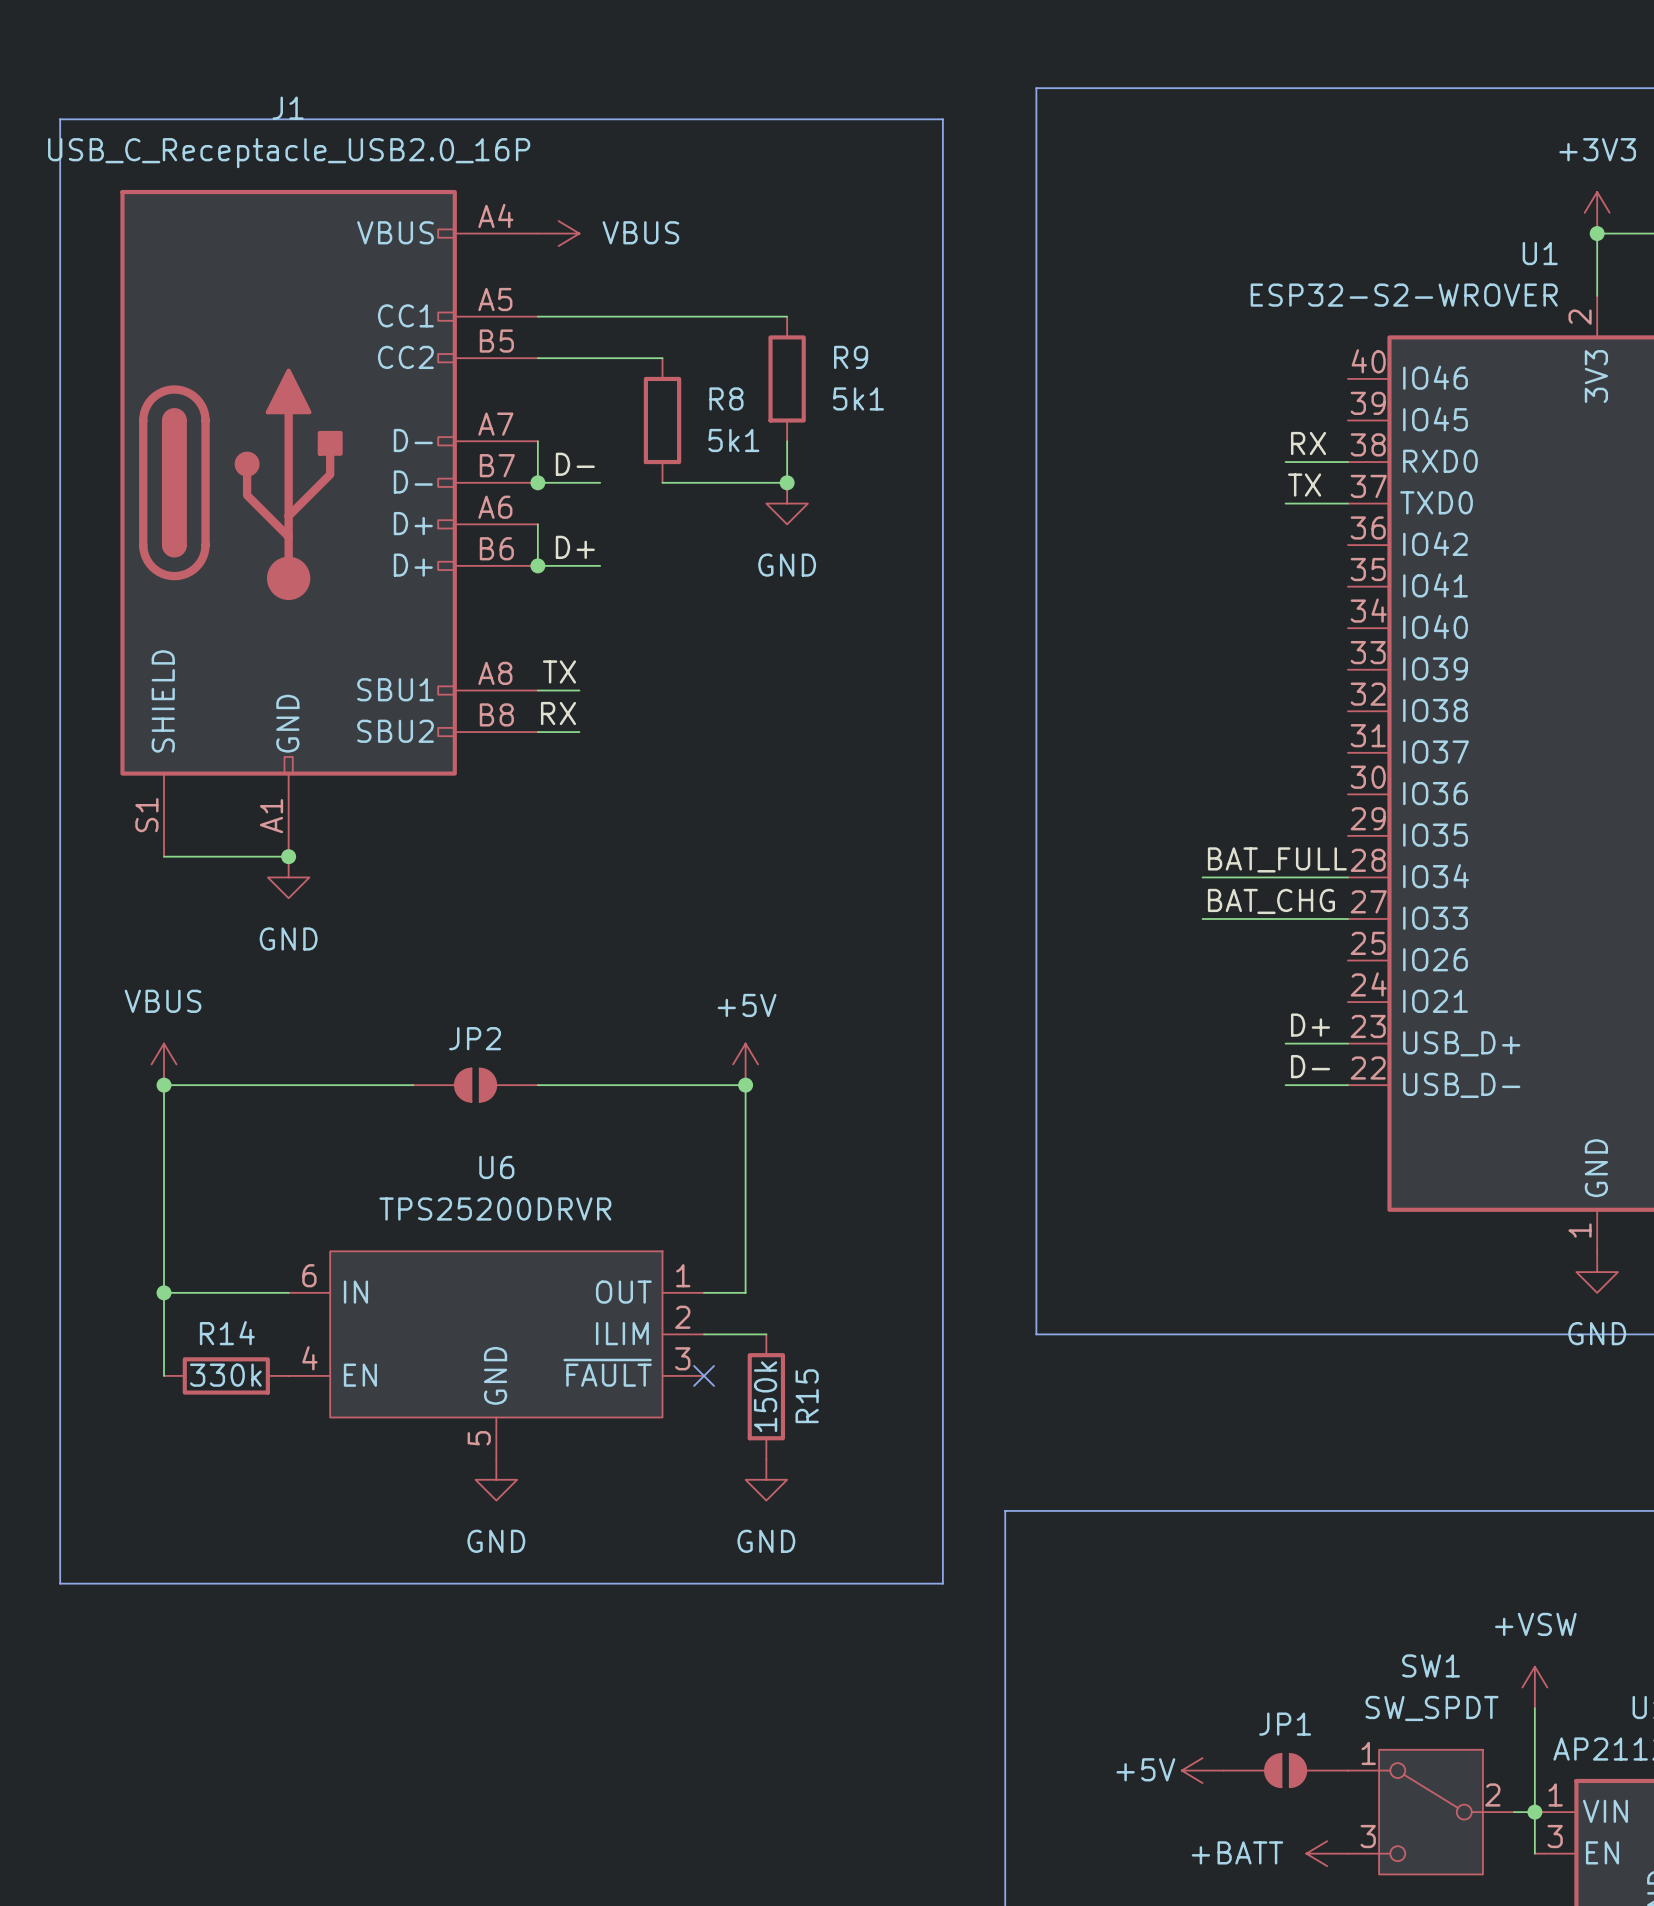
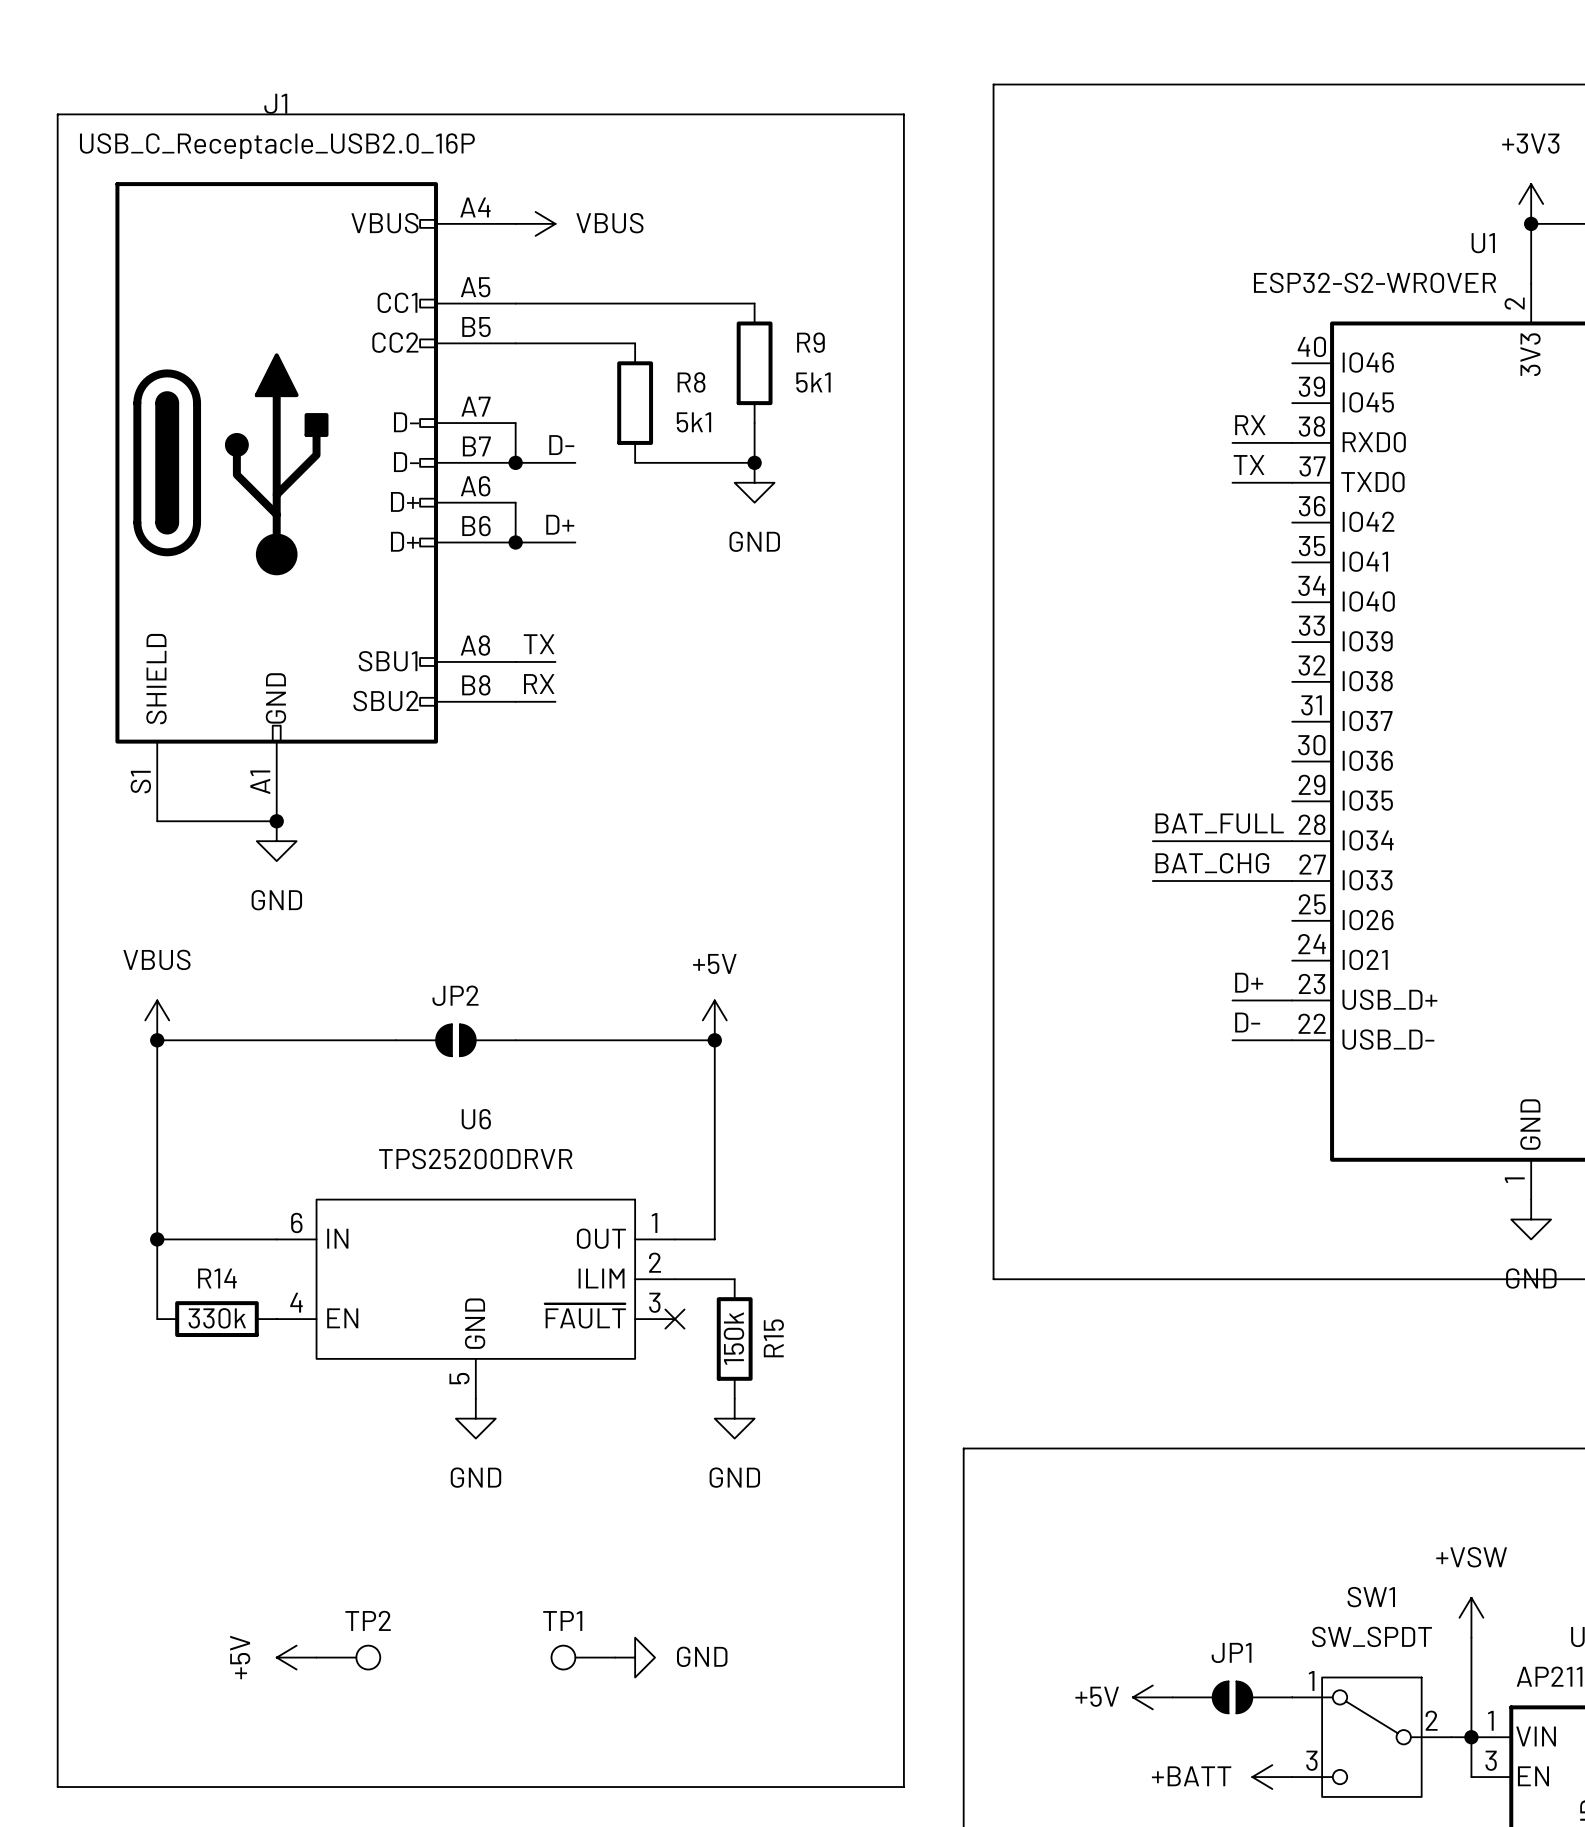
line: (60, 1583) (942, 1583) -> (57, 1518) (57, 1787) (903, 1787) (903, 1518)
power symbol: none -> +5V (296, 1657)
TP2: none -> (348, 1657)
TP1: none -> (583, 1657)
power symbol: none -> GND (635, 1657)

